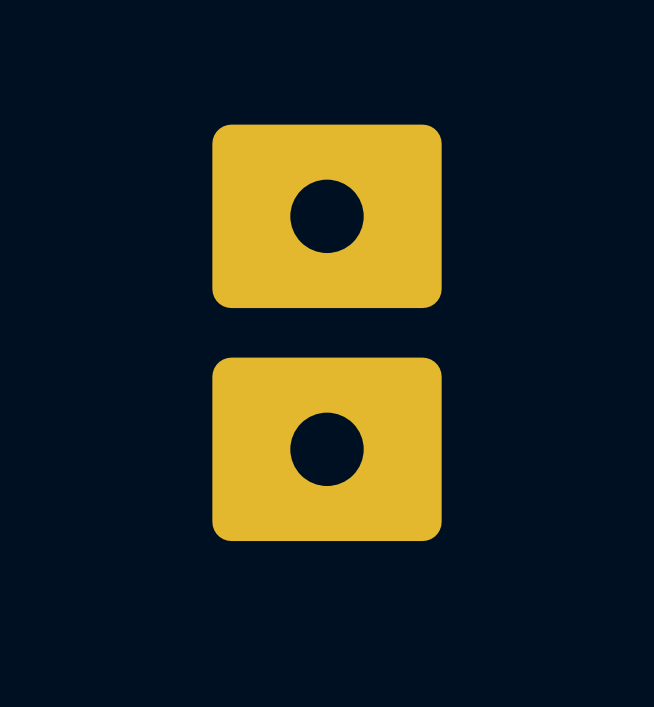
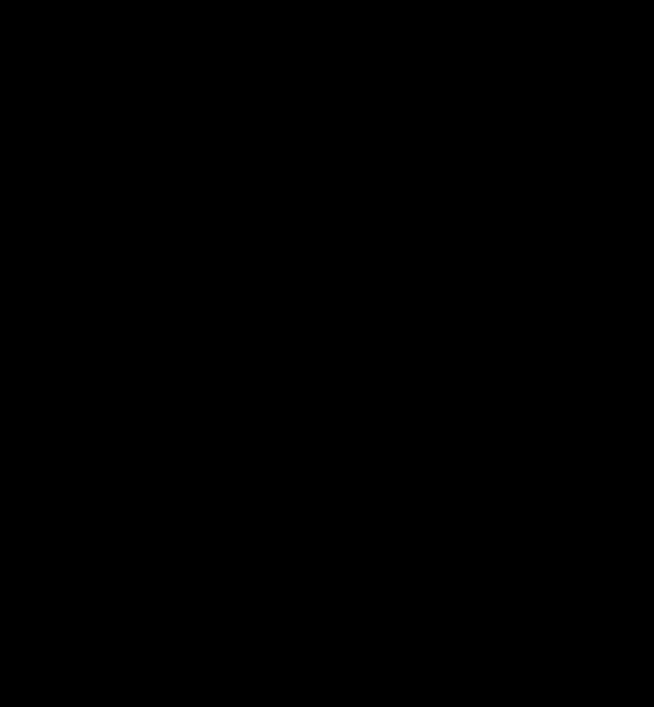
part: (327, 332) -> none

